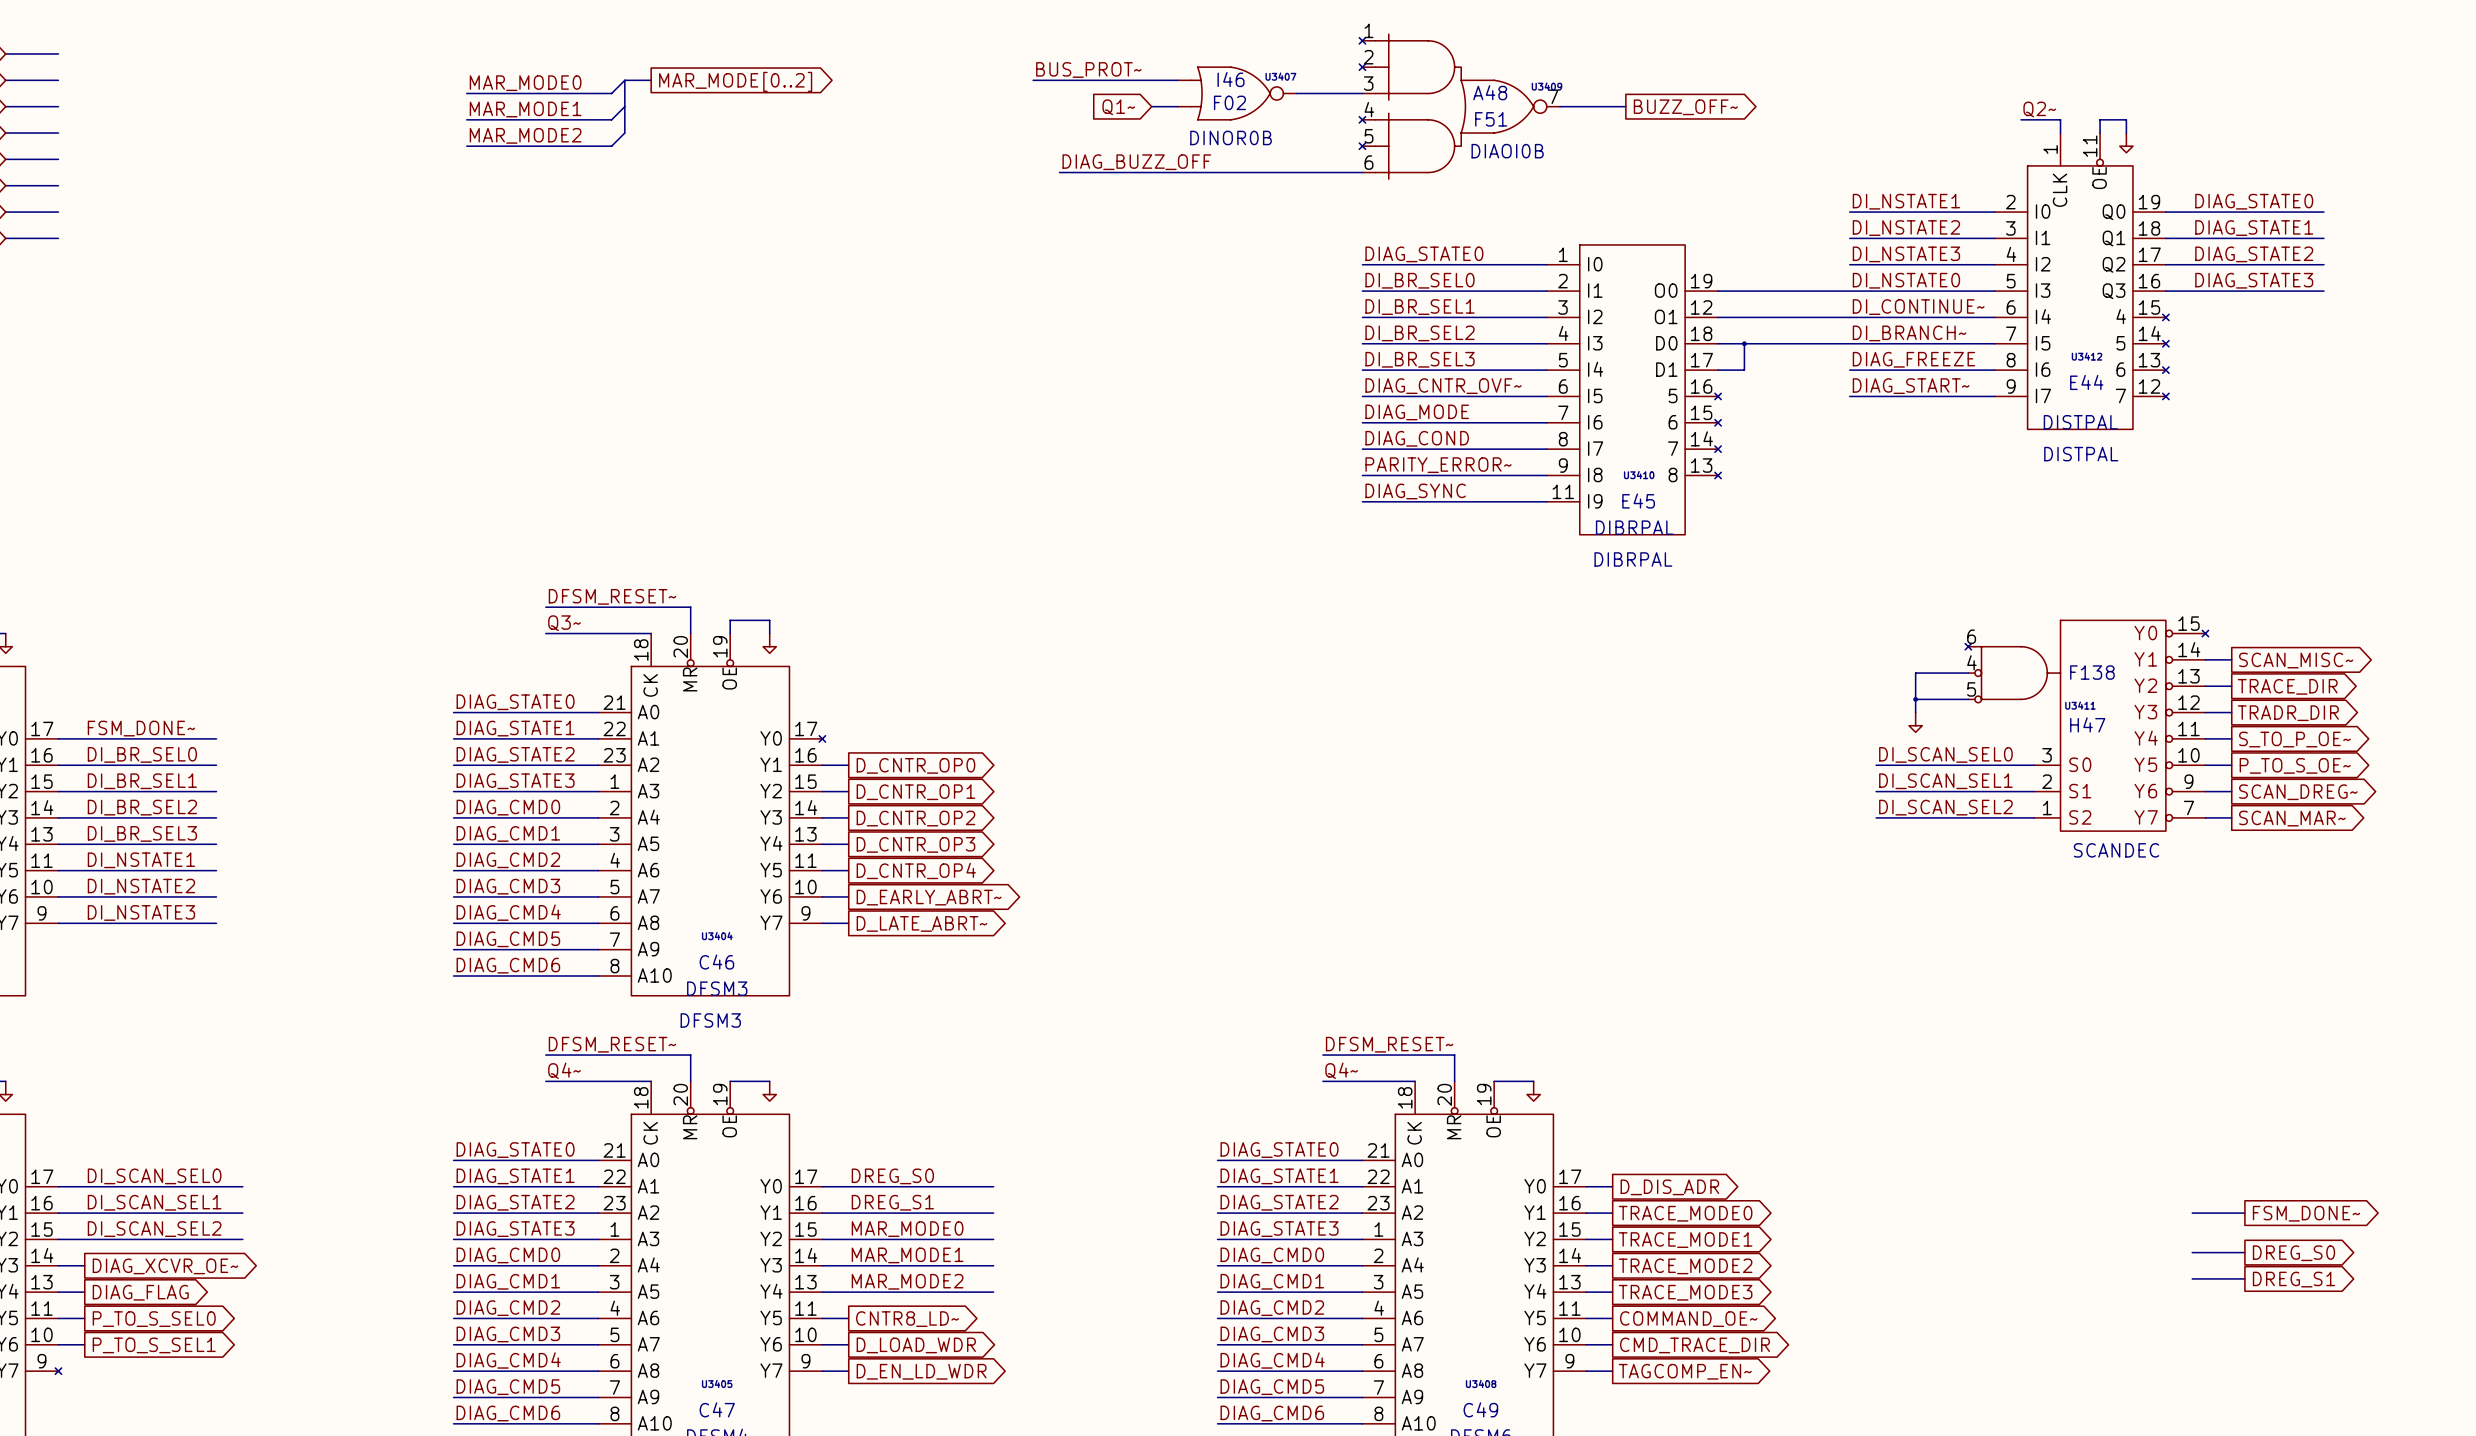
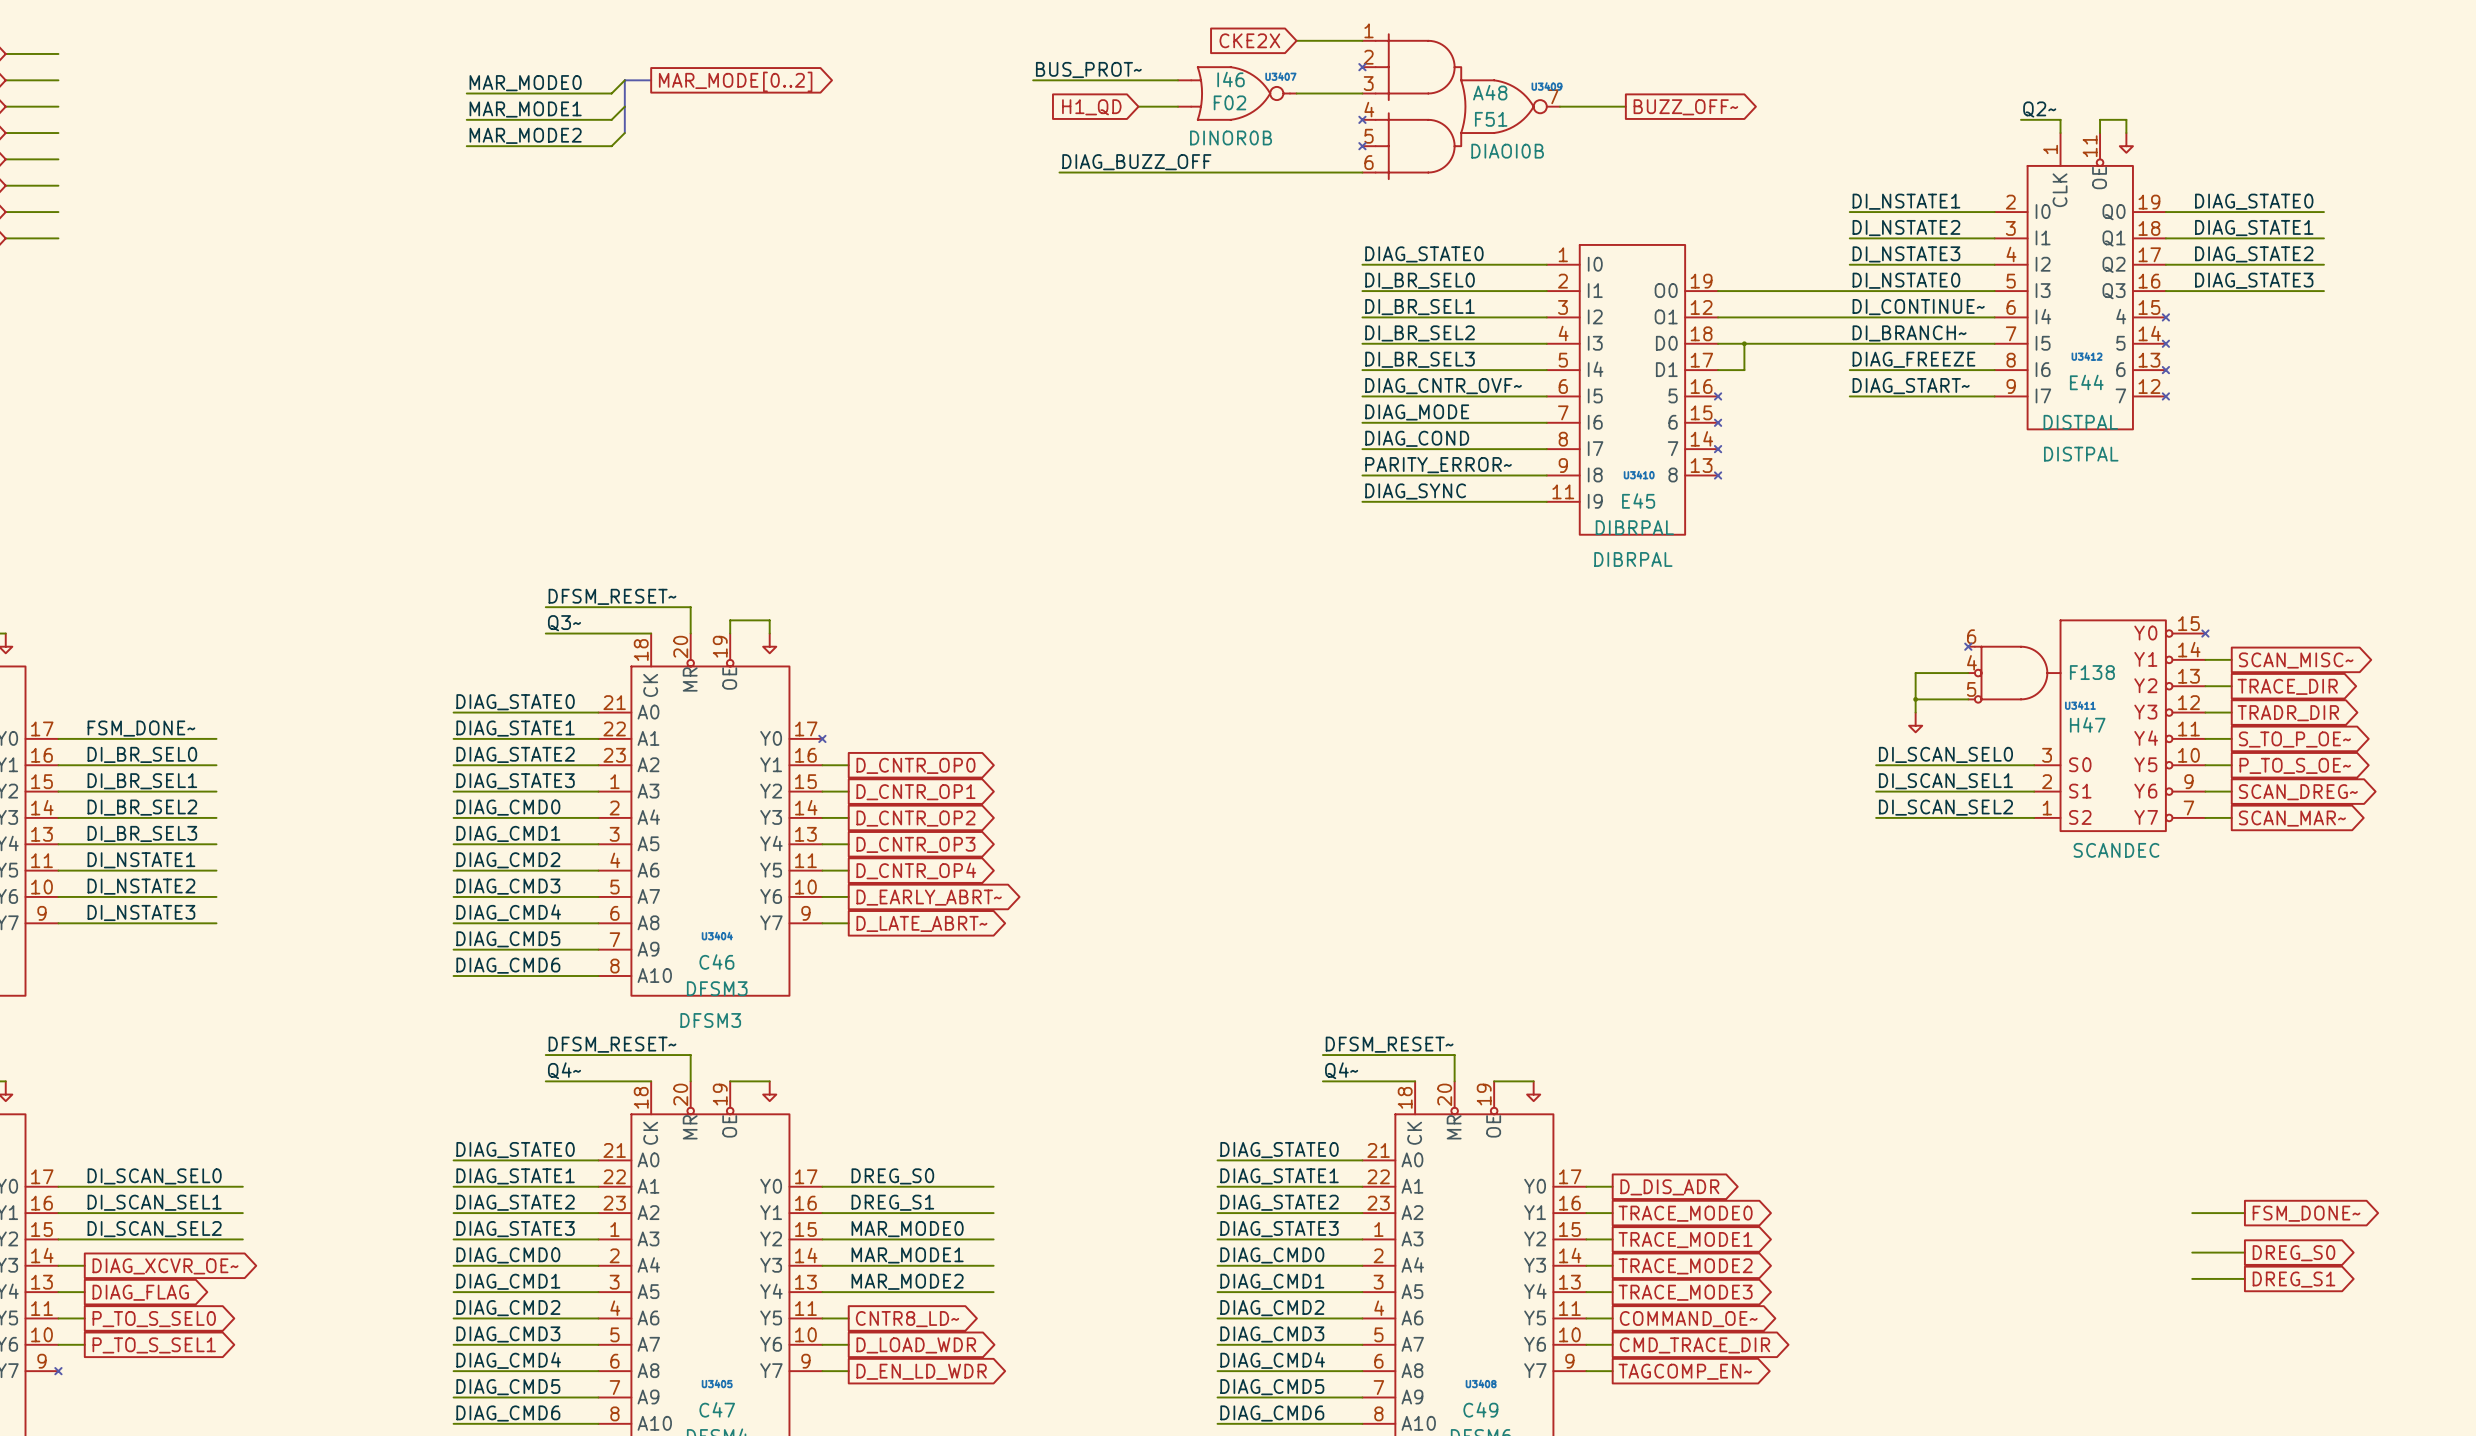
global label: none -> CKE2X (1249, 40)
wire: none -> (1296, 40) (1362, 40)
no-connect mark: (1362, 40) -> none
wire: none -> (1138, 106) (1151, 106)
global label: none -> H1_QD (1091, 107)
global label: Q1~ (1118, 107) -> none

